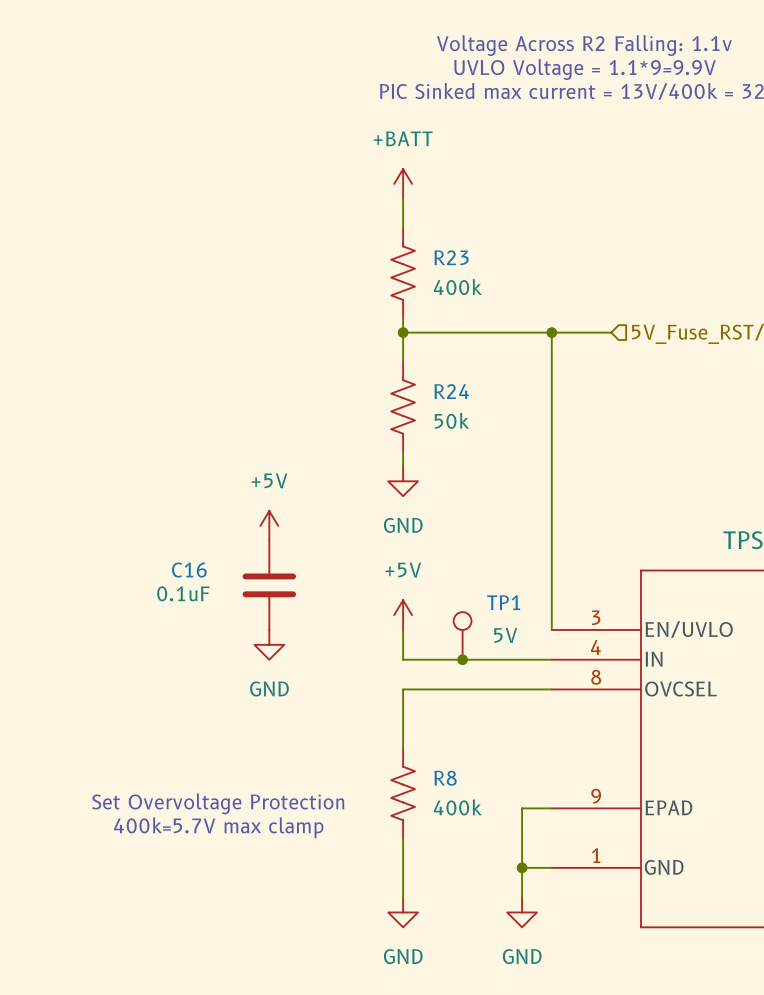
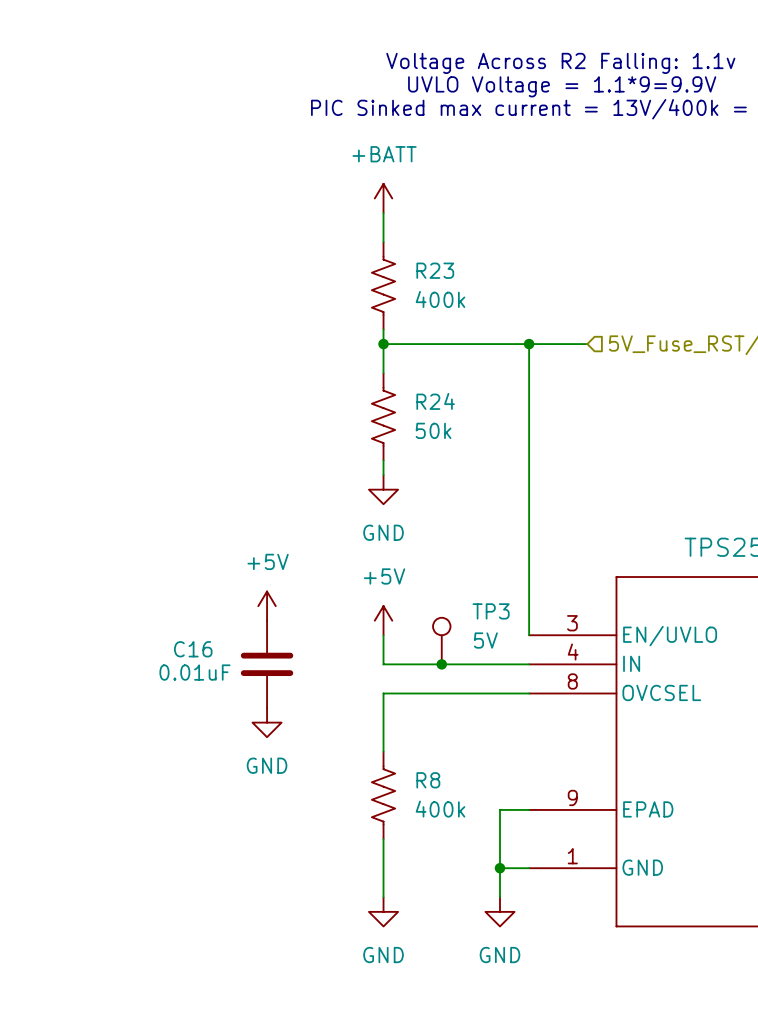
power symbol position: +5V (269, 525) -> +5V (267, 606)
C16 position: (269, 585) -> (267, 664)
C16 value: 0.1uF (183, 593) -> 0.01uF (194, 672)
TP1 name: TP1 (503, 602) -> TP3 (491, 611)
power symbol position: GND (269, 644) -> GND (267, 722)
text: Set Overvoltage Protection (218, 803) -> none
text: 400k=5.7V max clamp (218, 827) -> none

